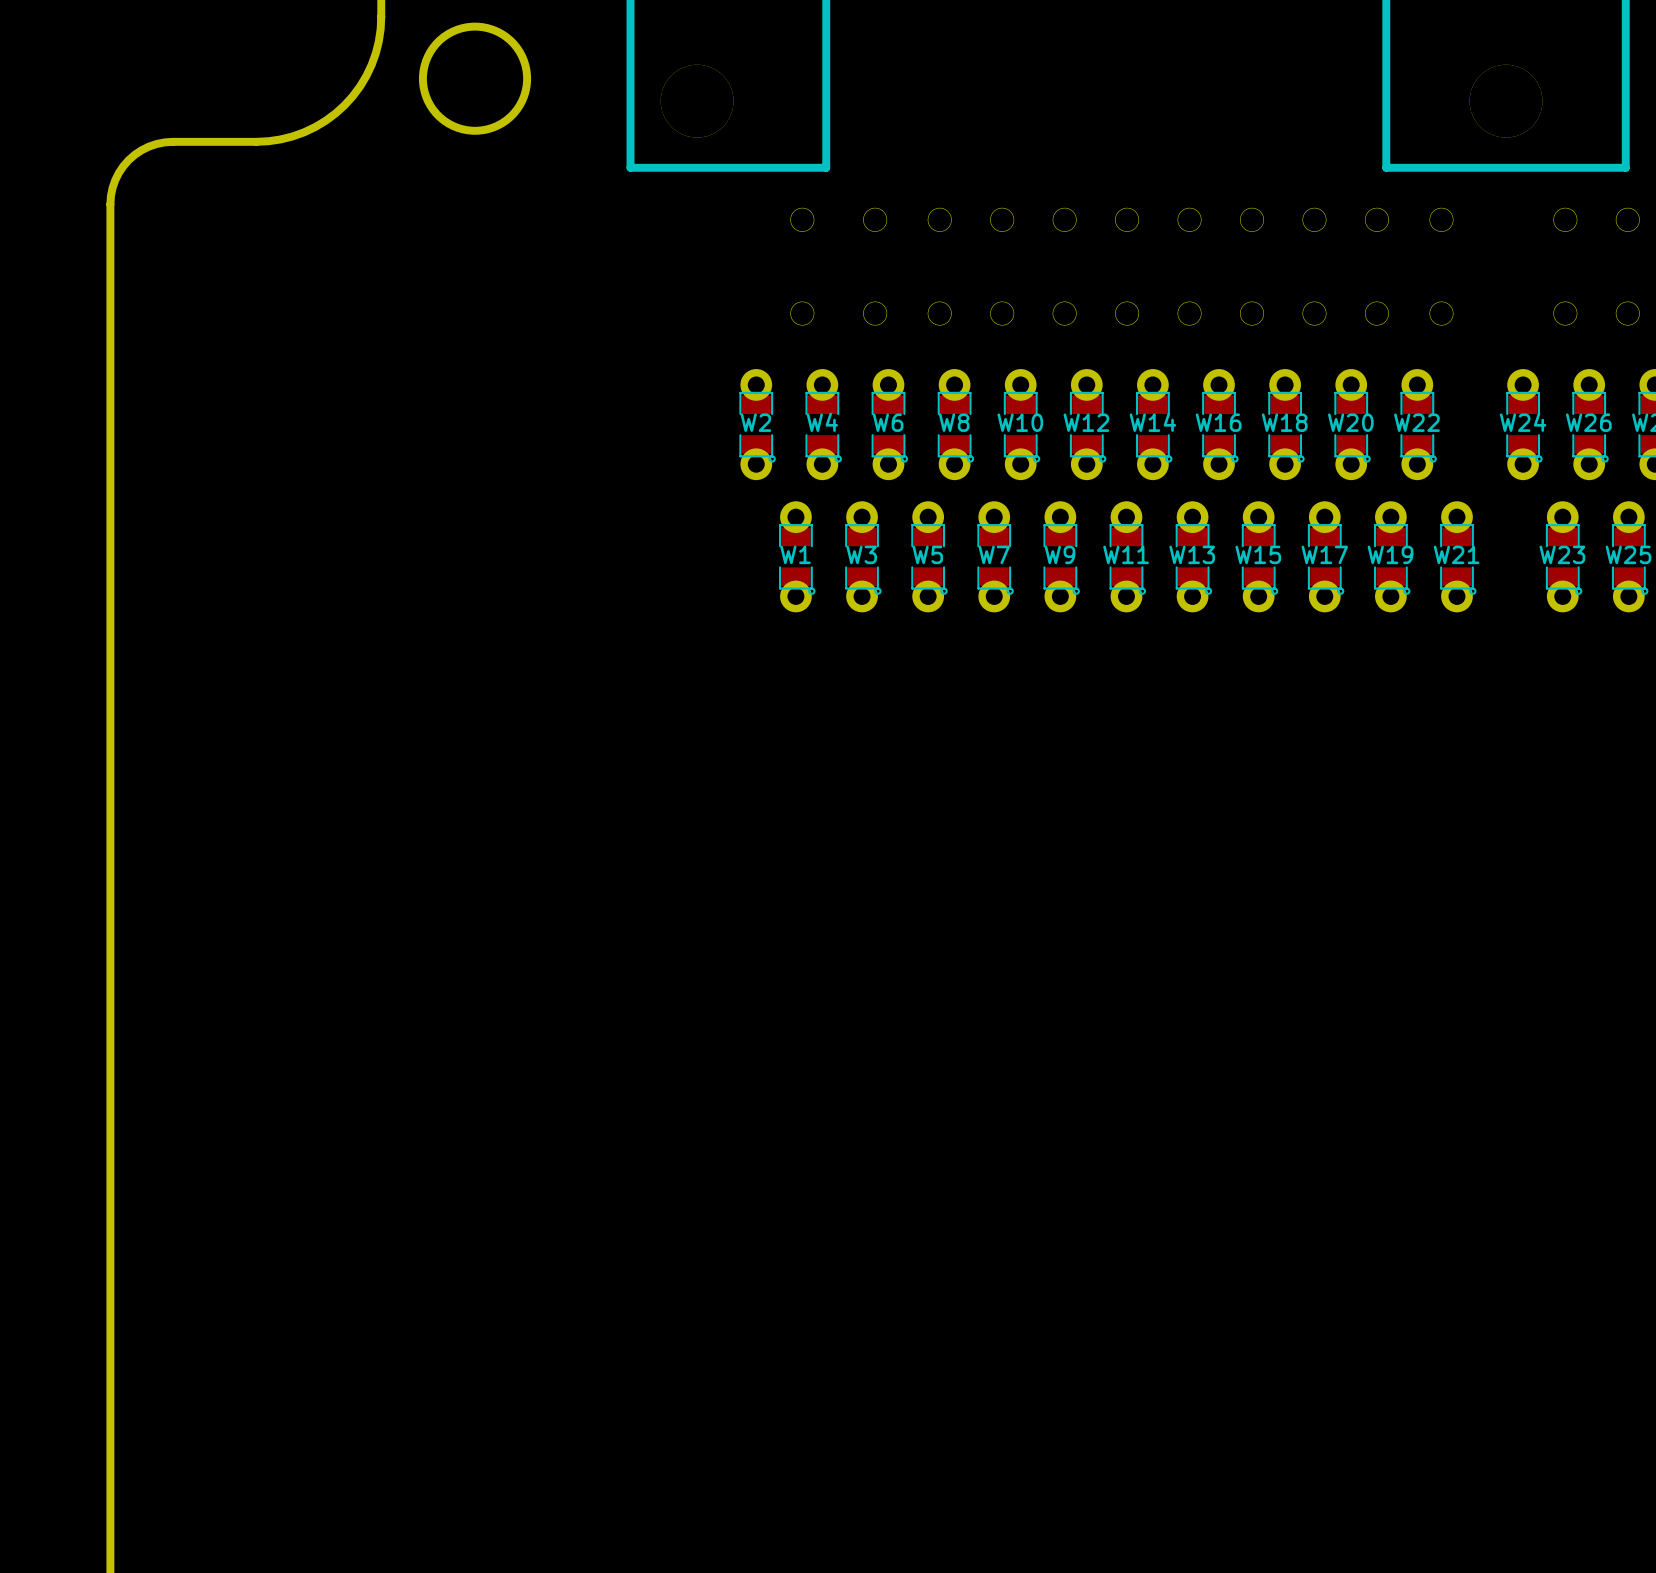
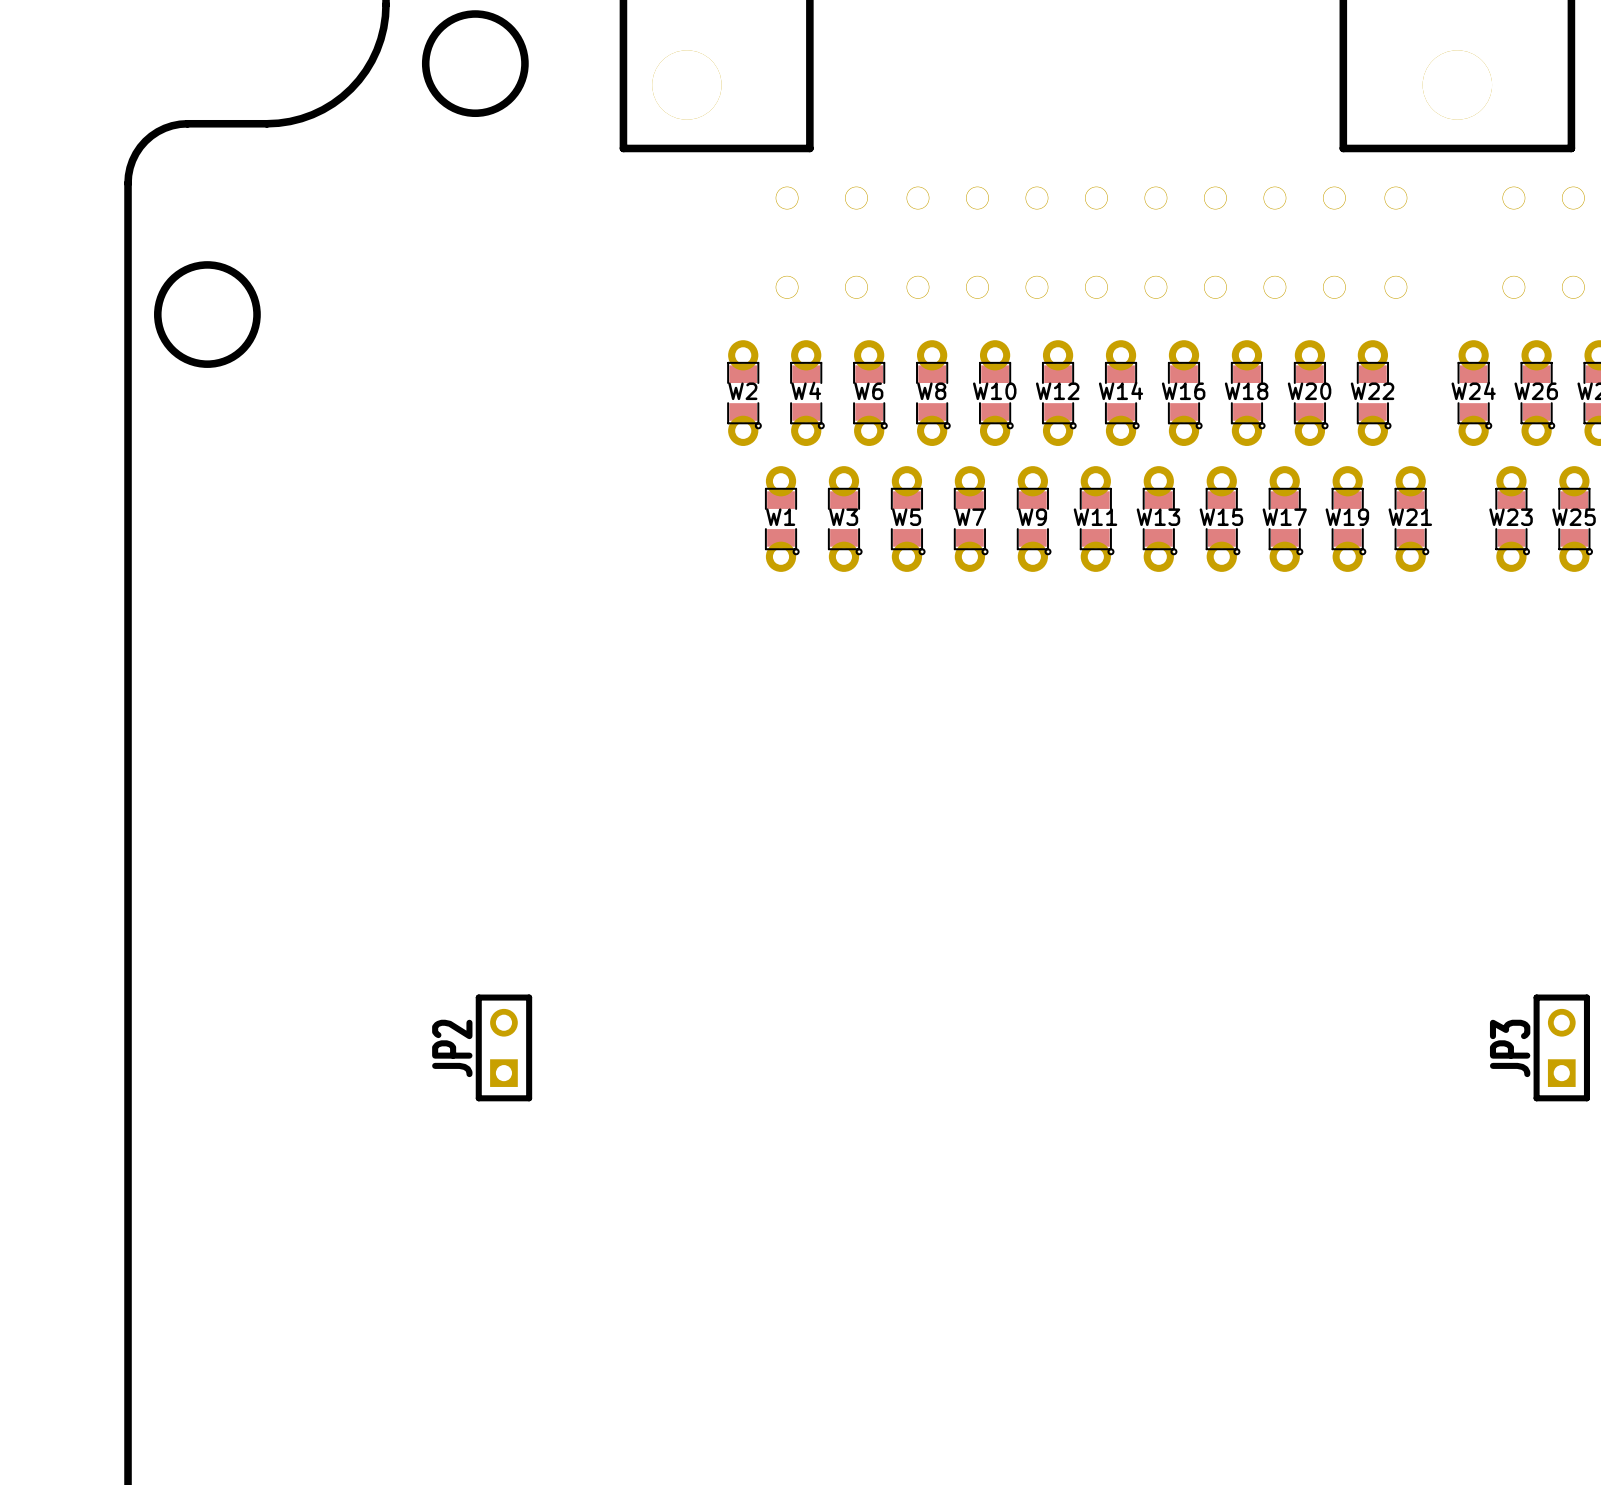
round board edge: none -> [154, 261, 261, 368]
JP2: none -> (503, 1047)
JP3: none -> (1561, 1047)

